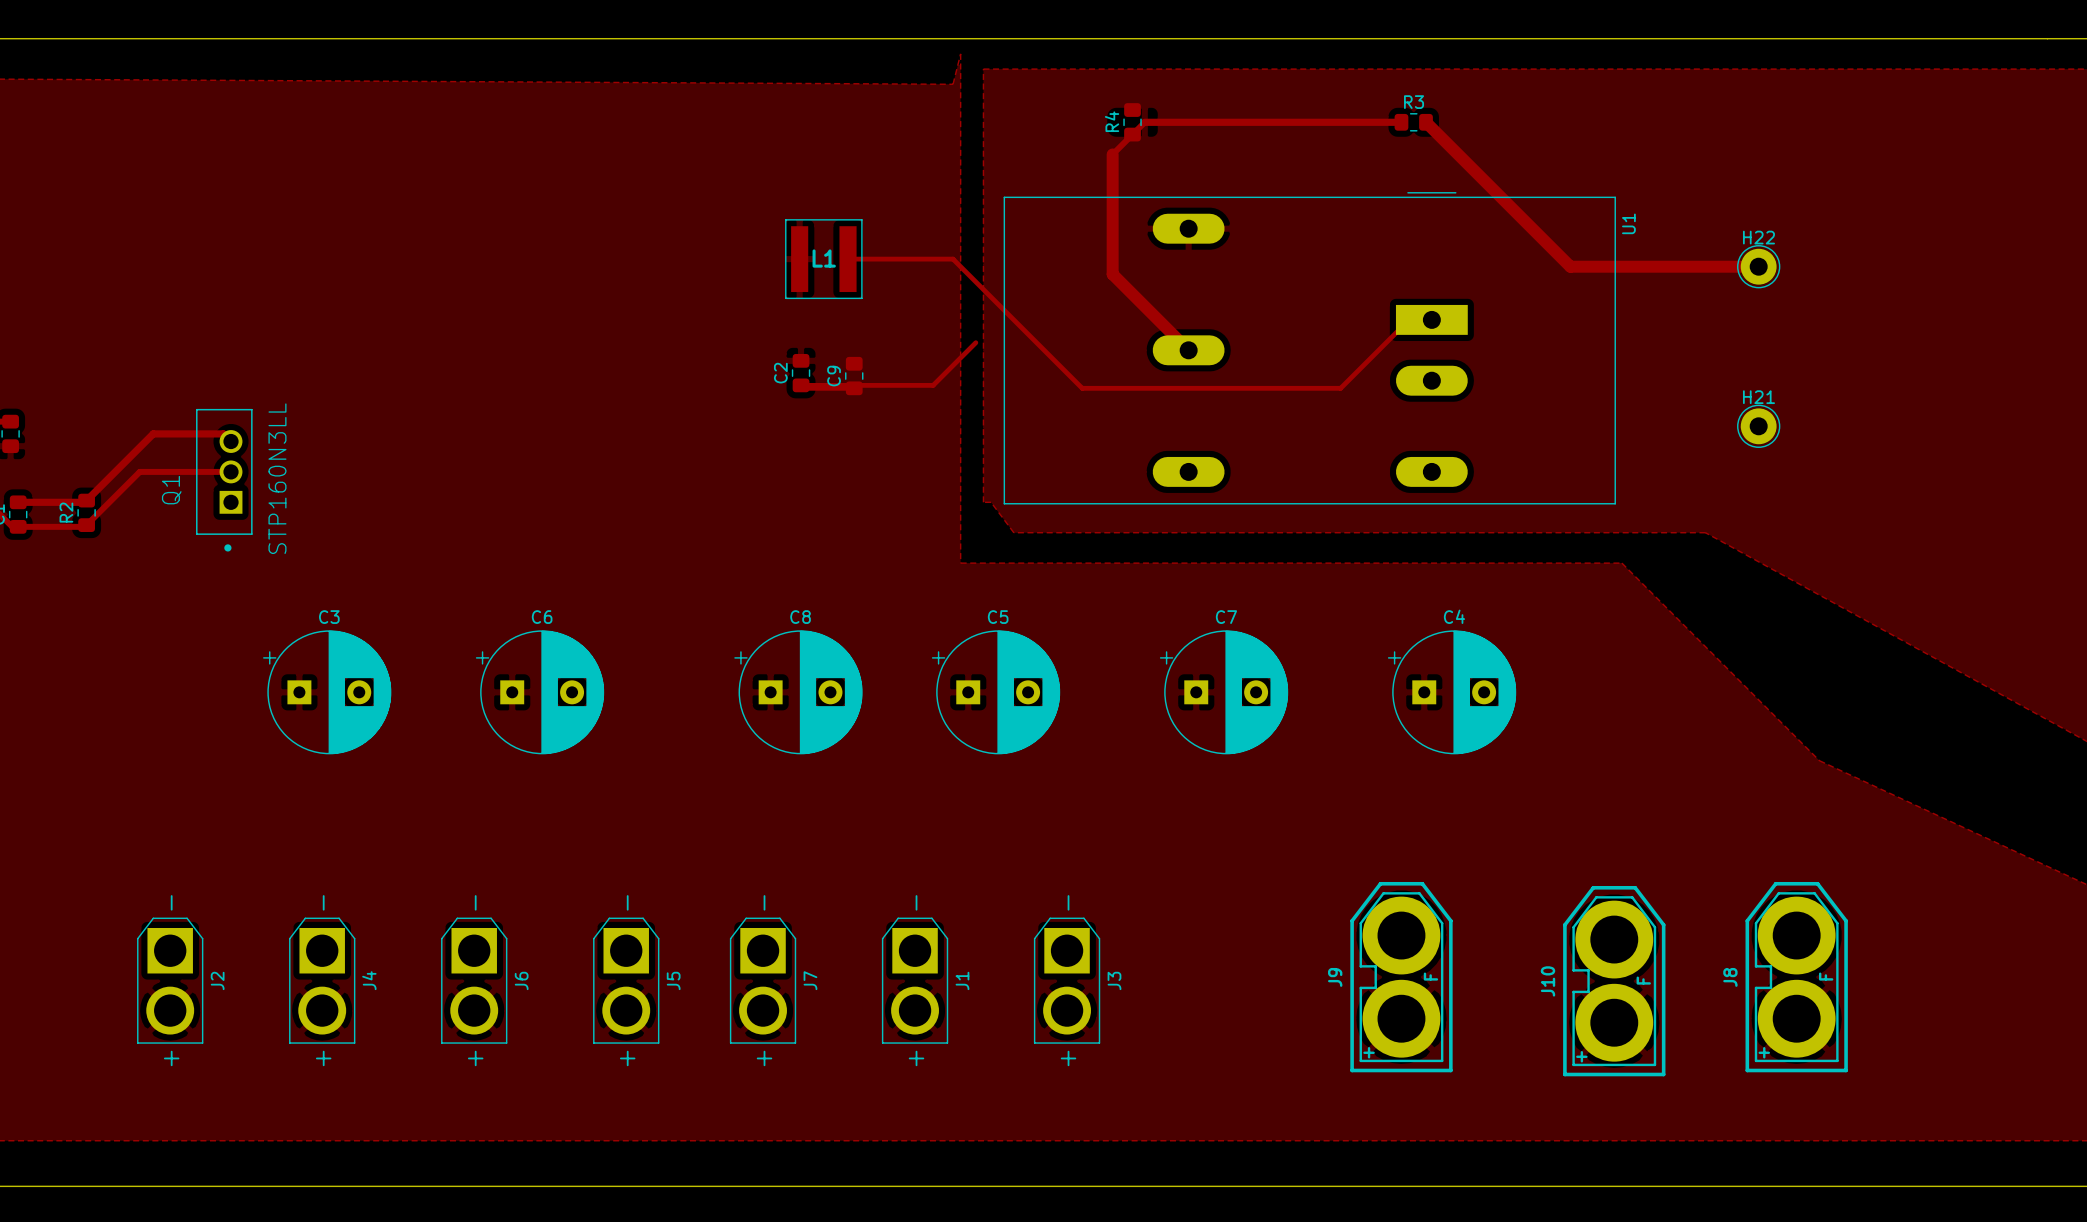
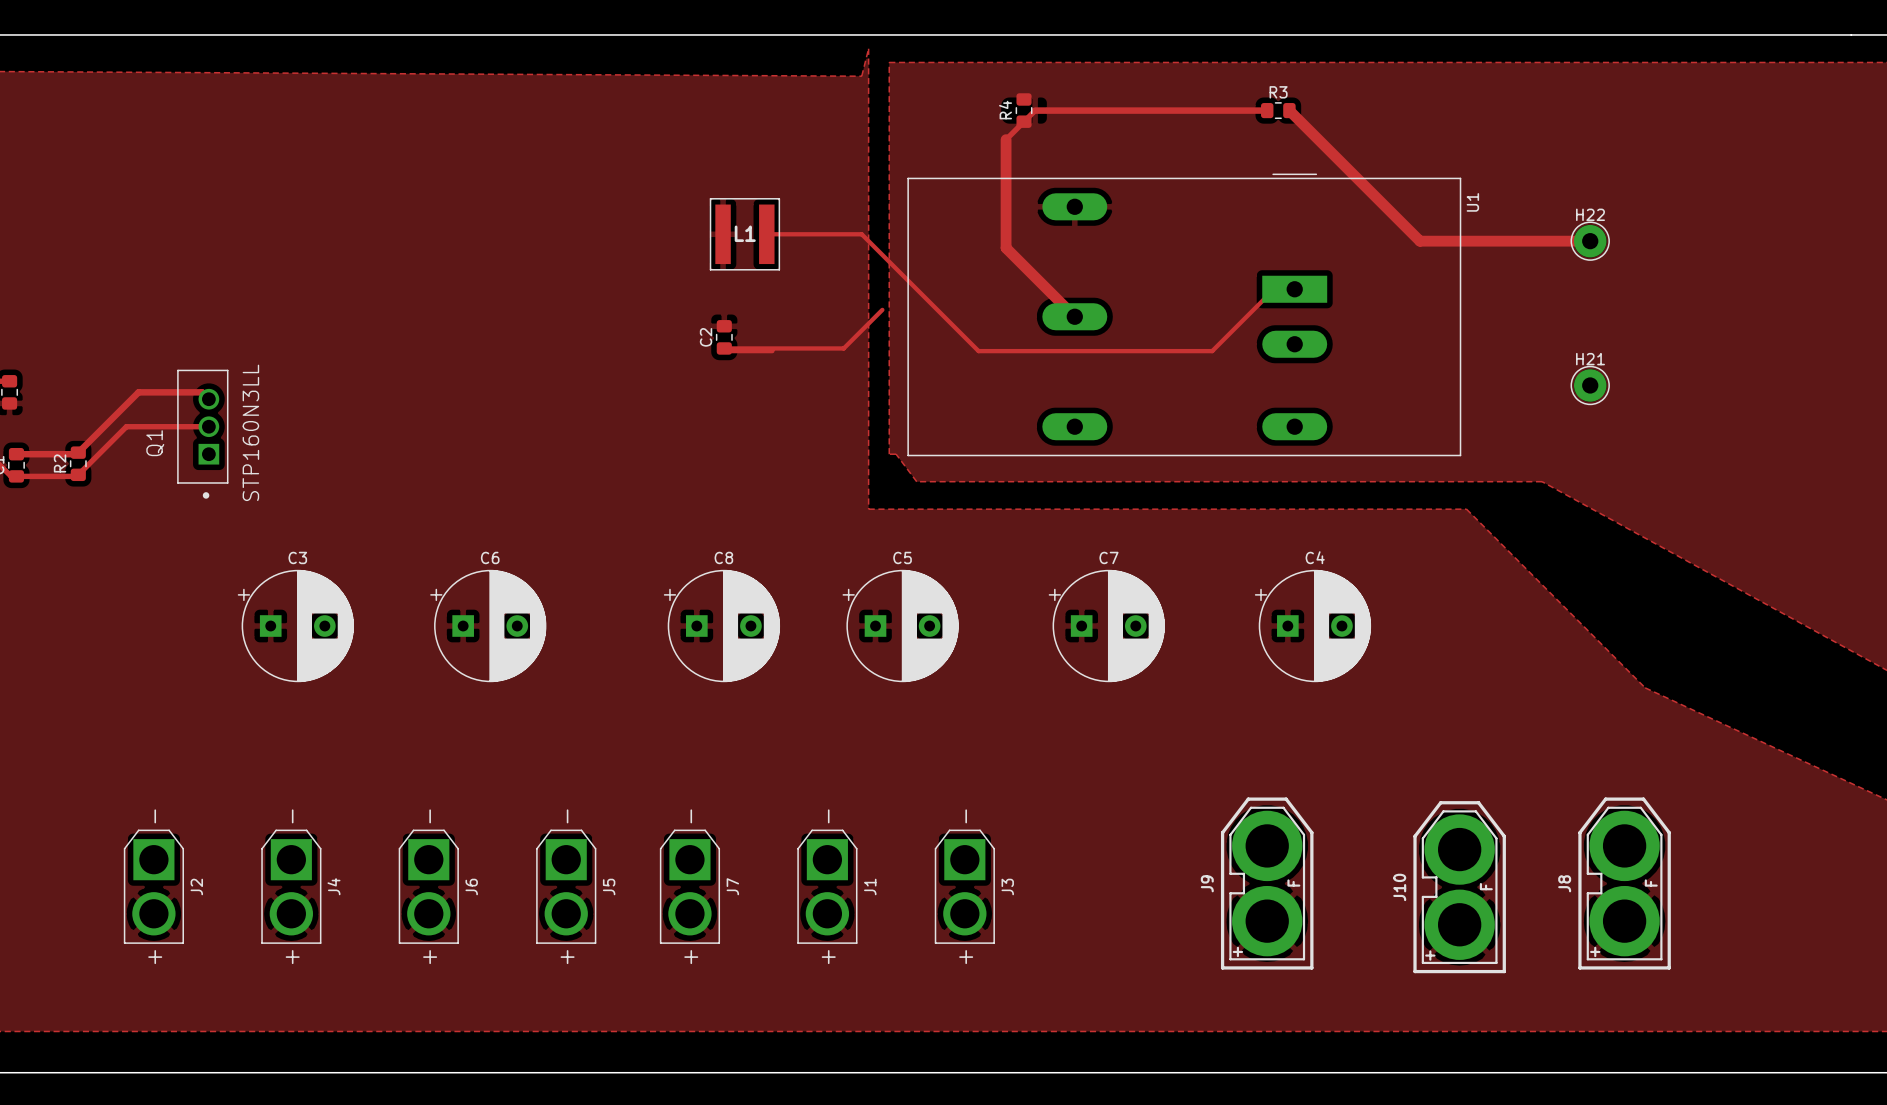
C9: (854, 376) -> none

